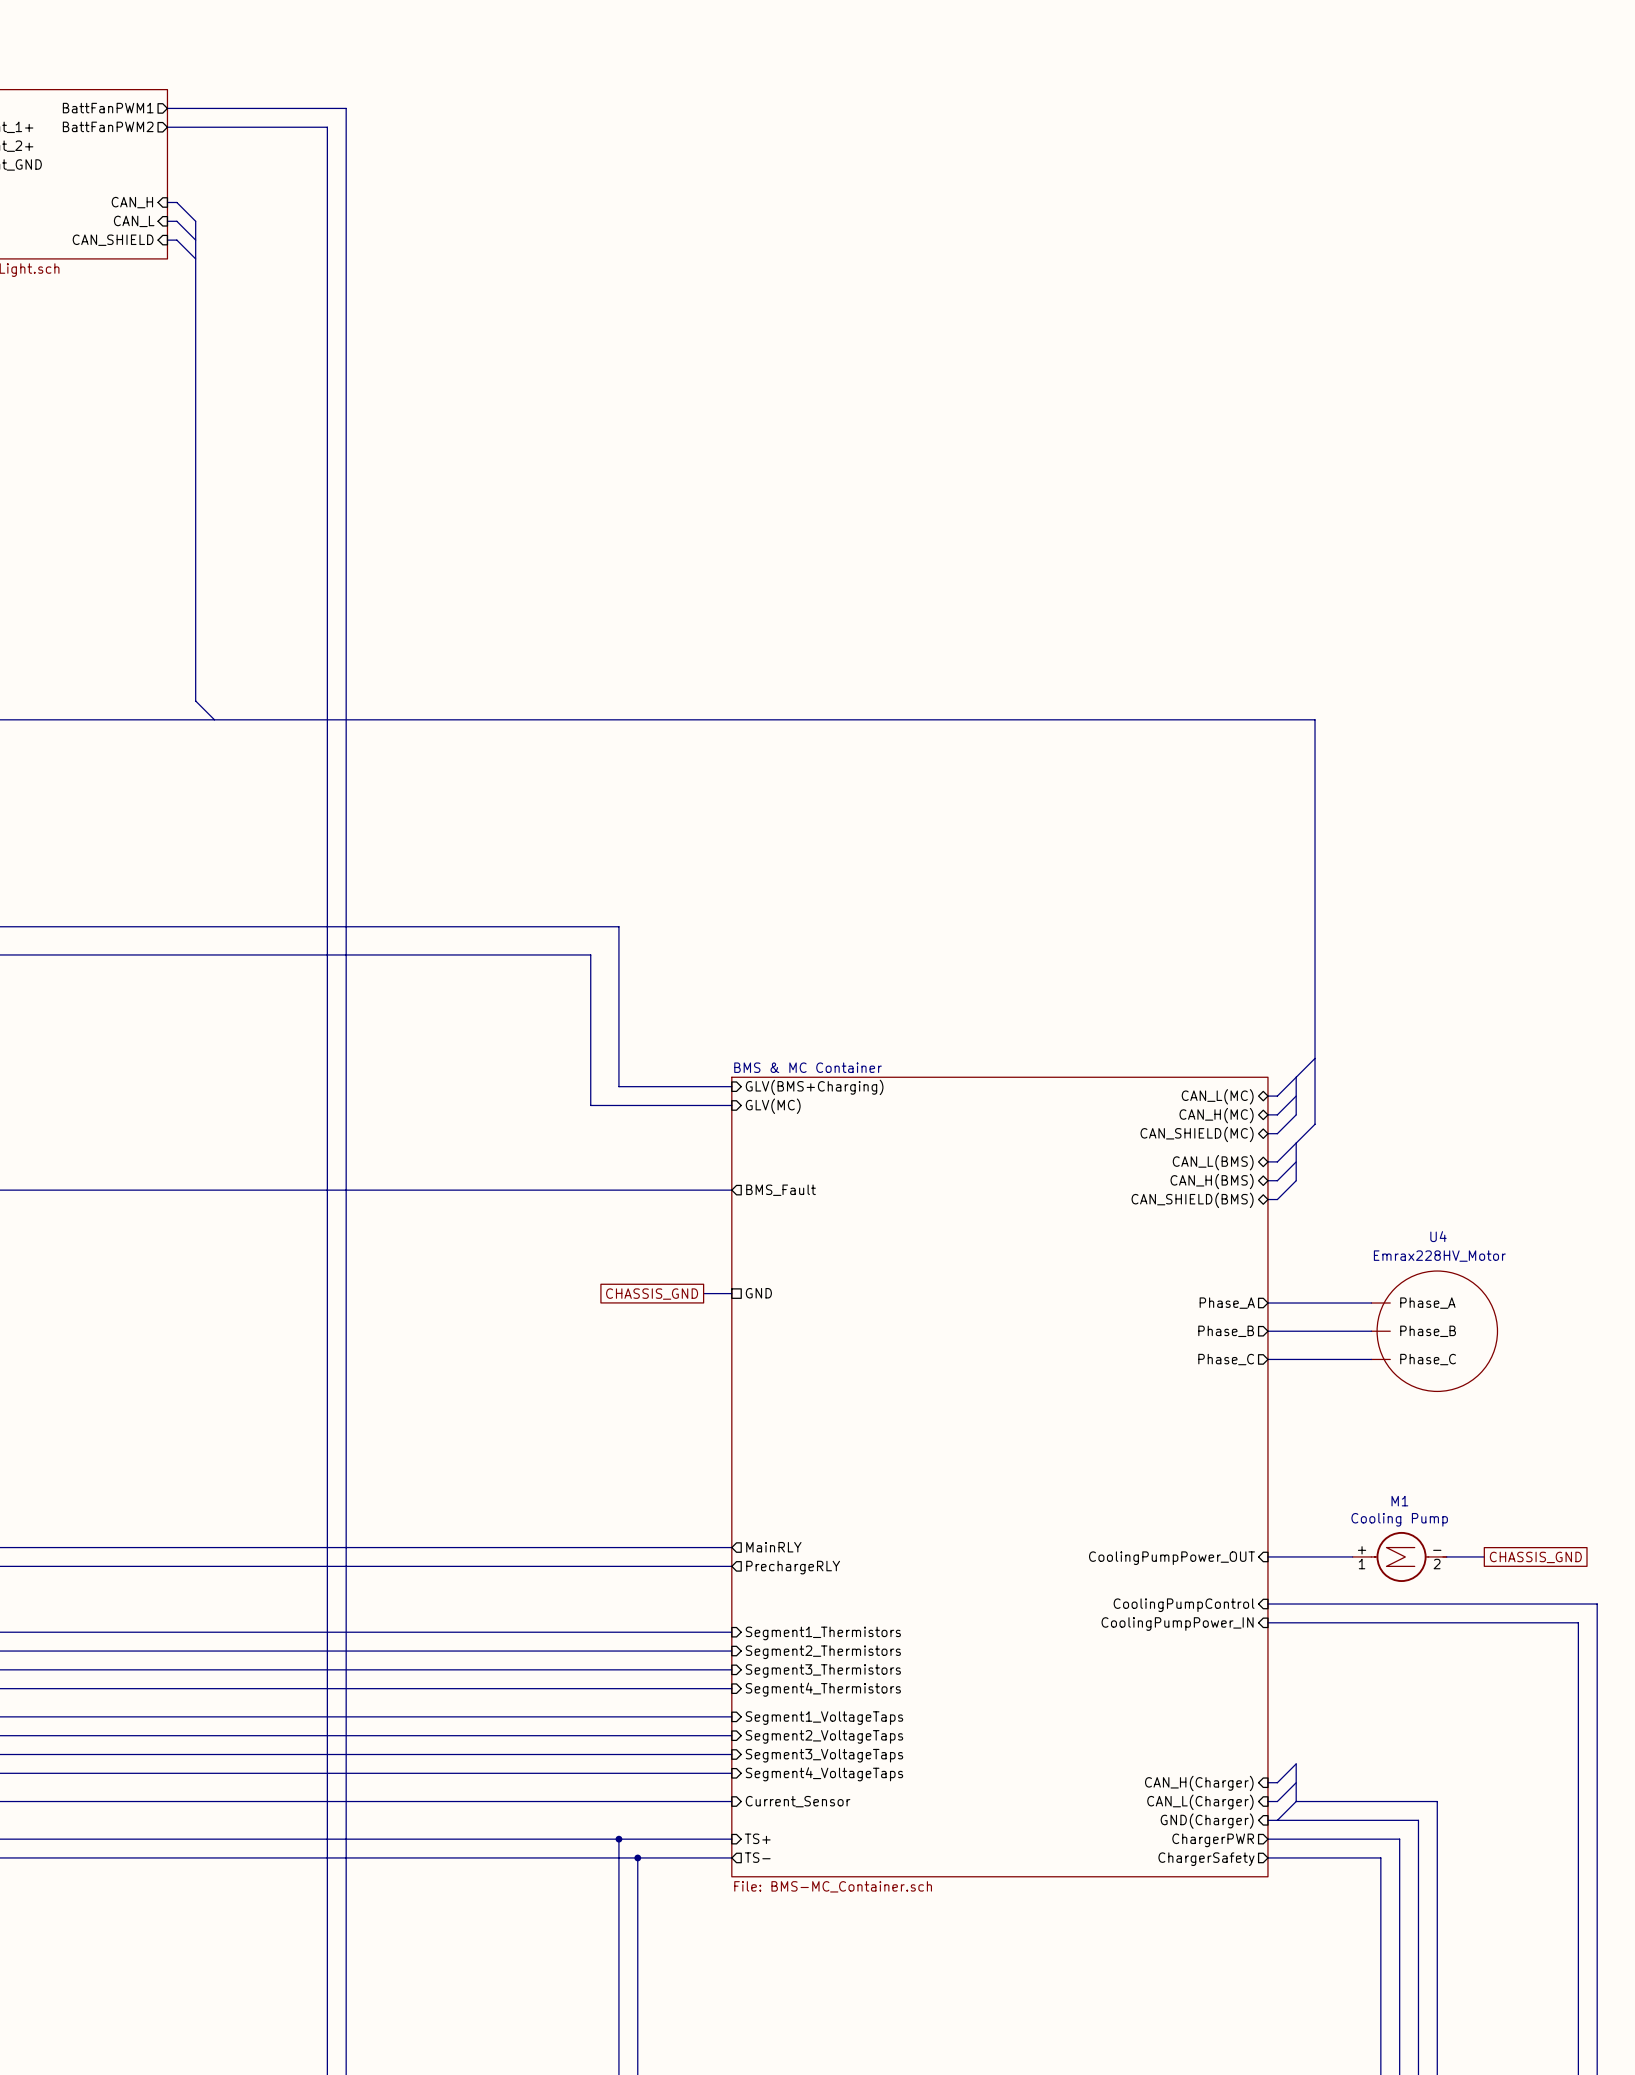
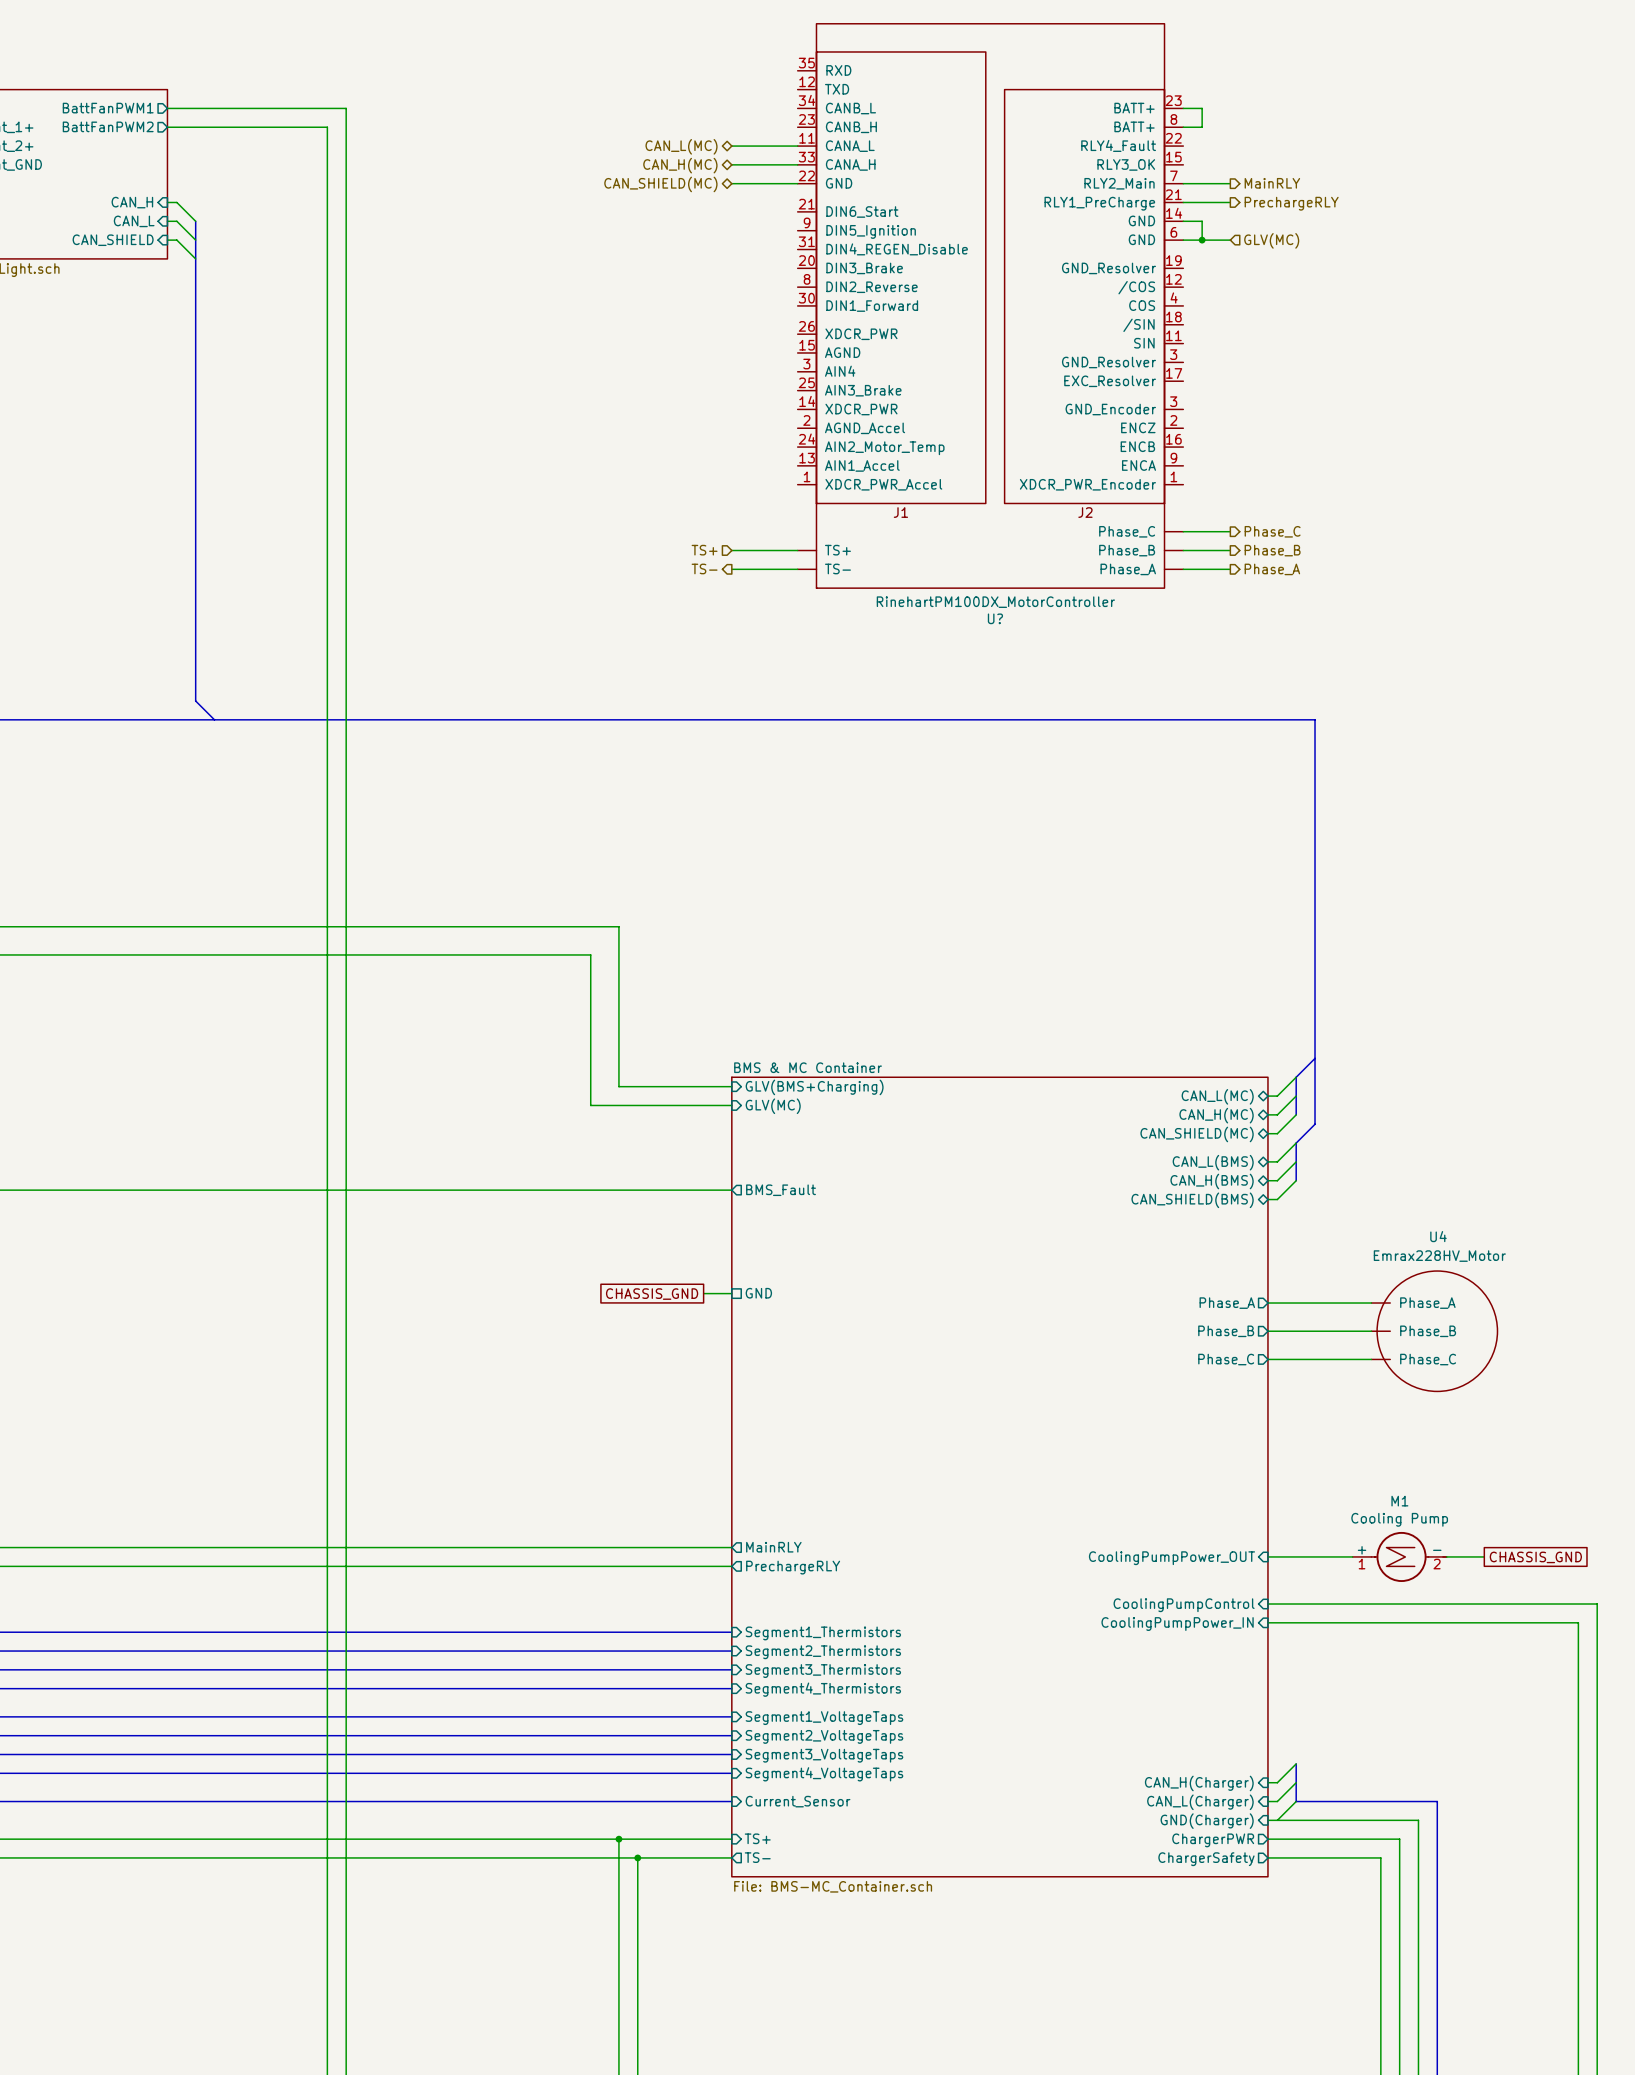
wire: none -> (1183, 108) (1202, 108) (1202, 127) (1183, 127)
hierarchical label: none -> CAN_L(MC) (681, 146)
wire: none -> (731, 146) (797, 146)
wire: none -> (731, 164) (797, 164)
hierarchical label: none -> CAN_H(MC) (680, 165)
wire: none -> (731, 183) (797, 183)
wire: none -> (1183, 183) (1230, 183)
hierarchical label: none -> MainRLY (1272, 183)
hierarchical label: none -> CAN_SHIELD(MC) (660, 184)
wire: none -> (1183, 202) (1230, 202)
hierarchical label: none -> PrechargeRLY (1291, 203)
wire: none -> (1183, 221) (1202, 221) (1202, 240)
wire: none -> (1183, 240) (1230, 240)
junction: none -> (1202, 240)
hierarchical label: none -> GLV(MC) (1271, 240)
U?: none -> RinehartPM100DX_MotorController (990, 305)
wire: none -> (1183, 531) (1230, 531)
hierarchical label: none -> Phase_C (1272, 531)
hierarchical label: none -> TS+ (704, 550)
wire: none -> (731, 550) (797, 550)
wire: none -> (1183, 550) (1230, 550)
hierarchical label: none -> Phase_B (1272, 550)
hierarchical label: none -> TS- (704, 568)
wire: none -> (731, 569) (797, 569)
wire: none -> (1183, 569) (1230, 569)
hierarchical label: none -> Phase_A (1272, 569)

